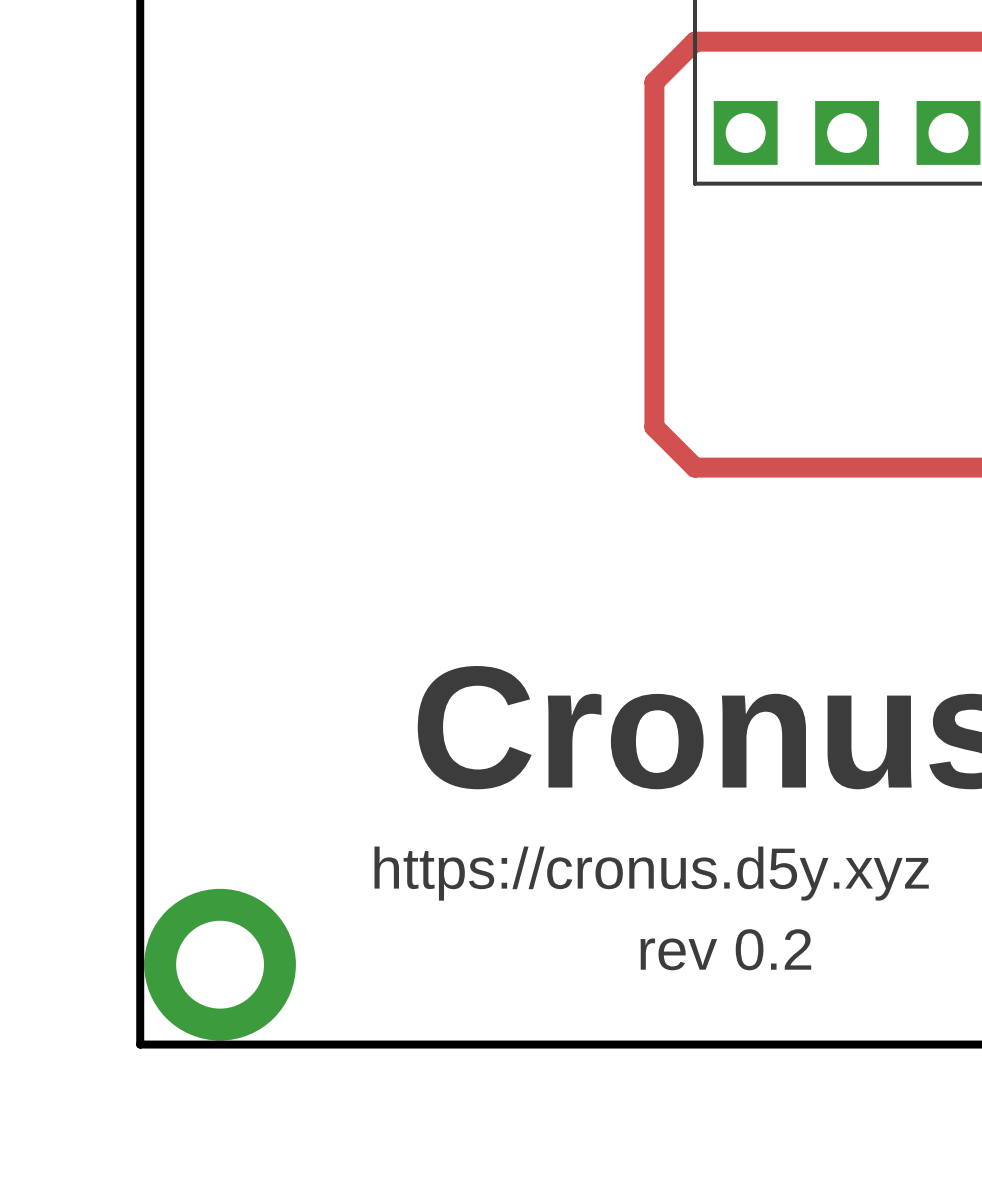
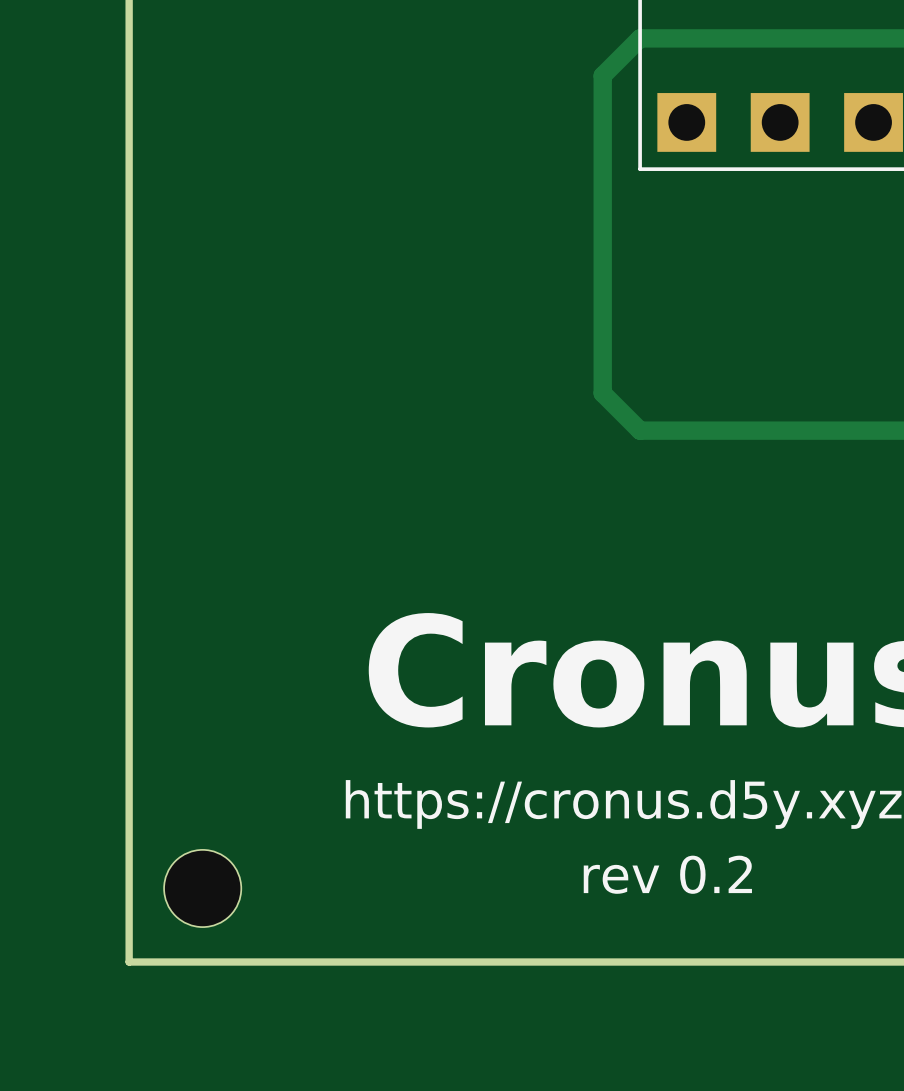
part footprint: [144, 888, 296, 1041] -> [164, 849, 242, 928]

